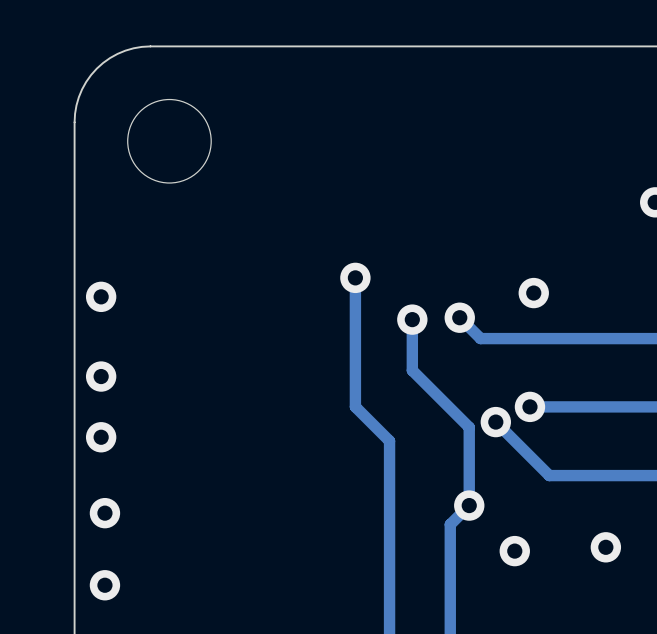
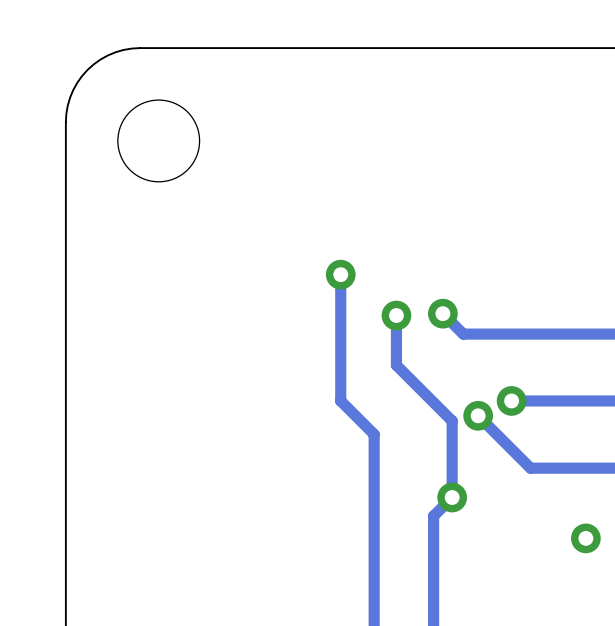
via: (533, 293) -> none
via: (101, 296) -> none
via: (101, 376) -> none
via: (101, 437) -> none
via: (104, 513) -> none
via: (514, 551) -> none
via: (104, 585) -> none

